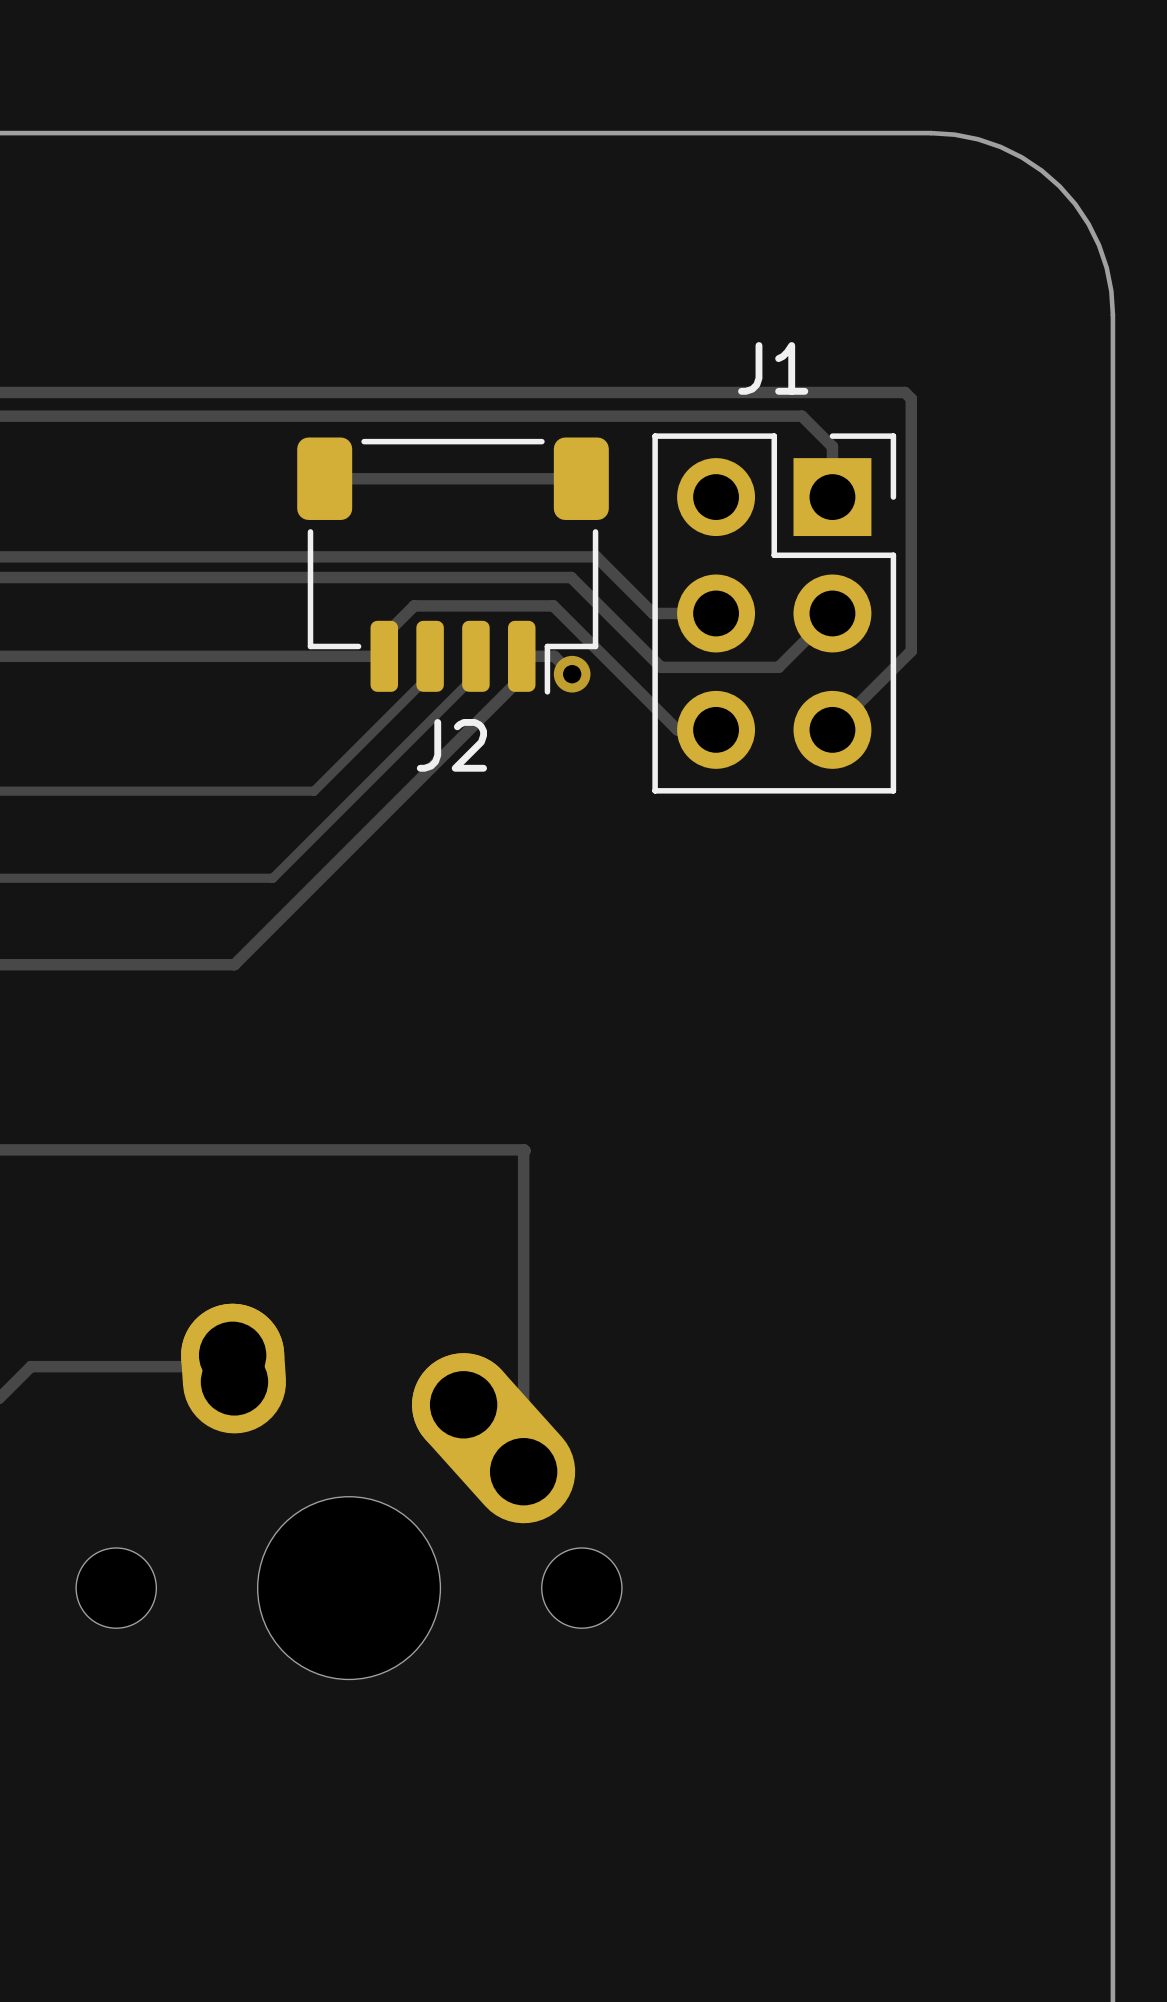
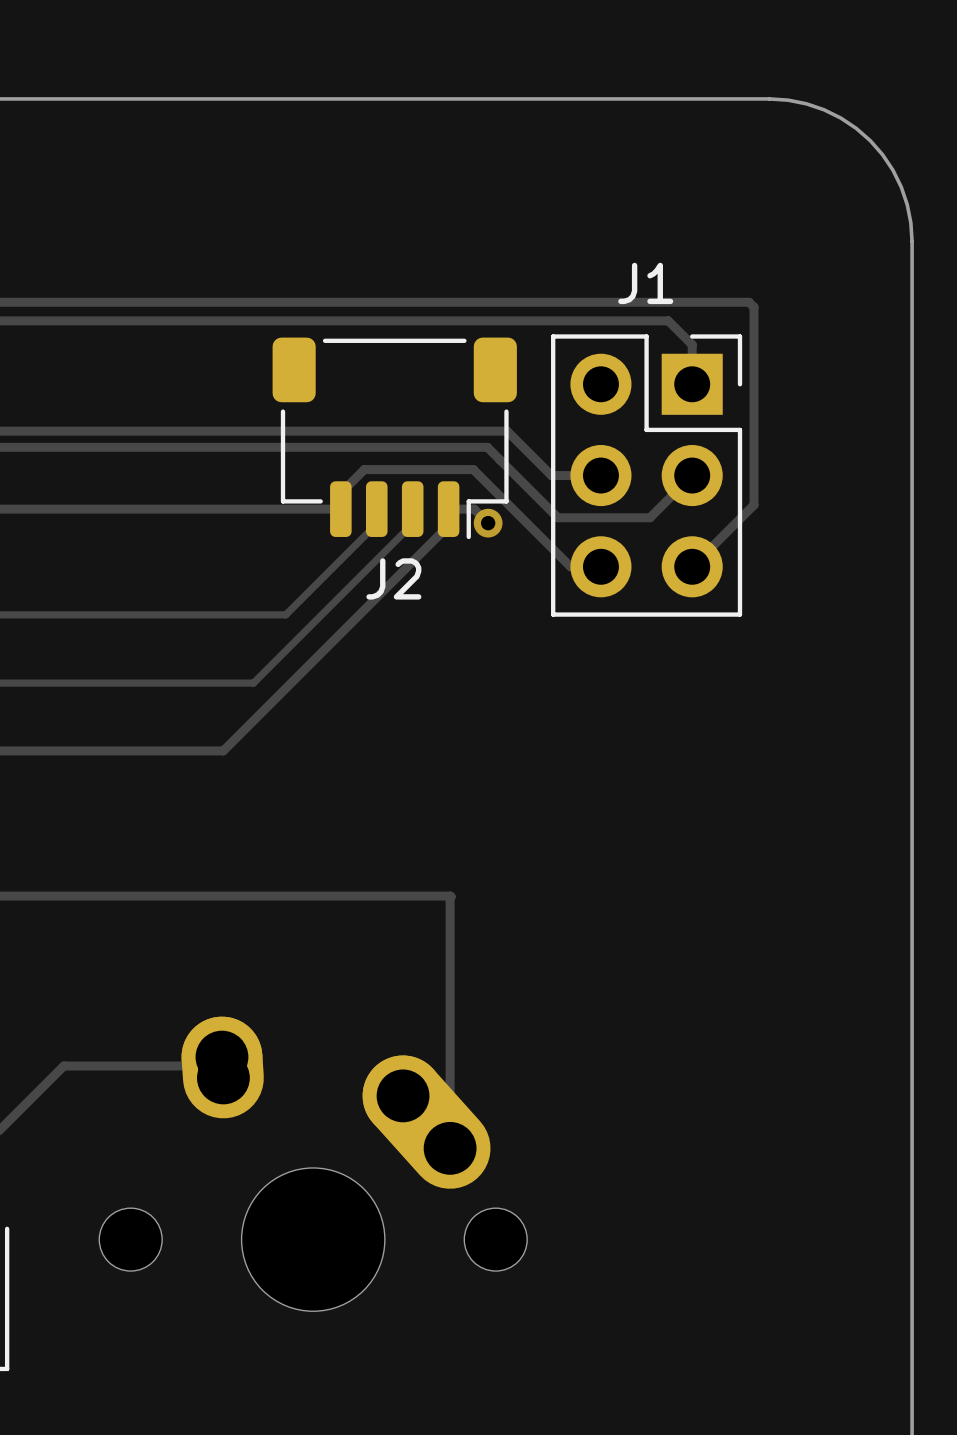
track: (581, 478) (324, 478) -> none

